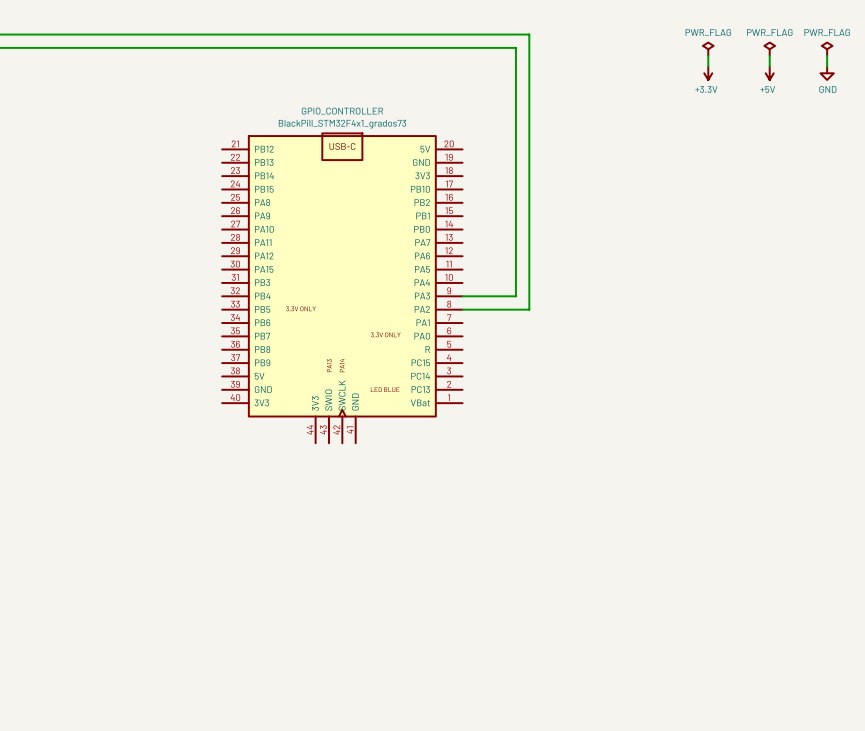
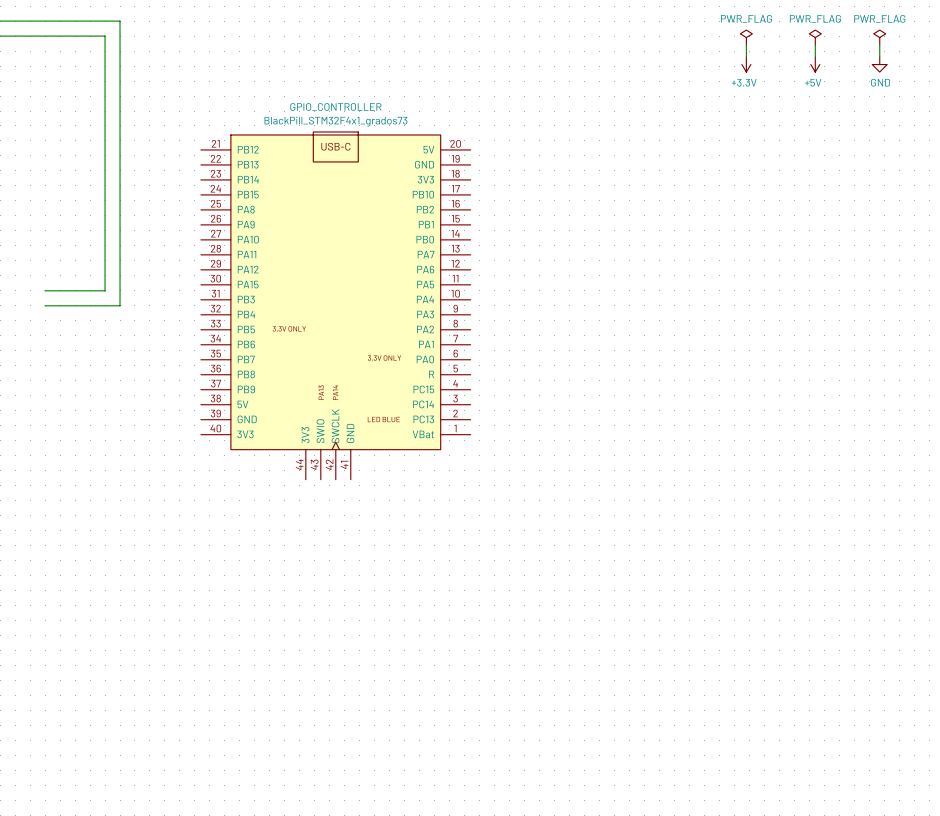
wire: (150, 34) (529, 34) (529, 309) (462, 309) -> (120, 21) (120, 305) (45, 305)
wire: (136, 47) (515, 47) (515, 296) (462, 296) -> (105, 36) (105, 290) (45, 290)

